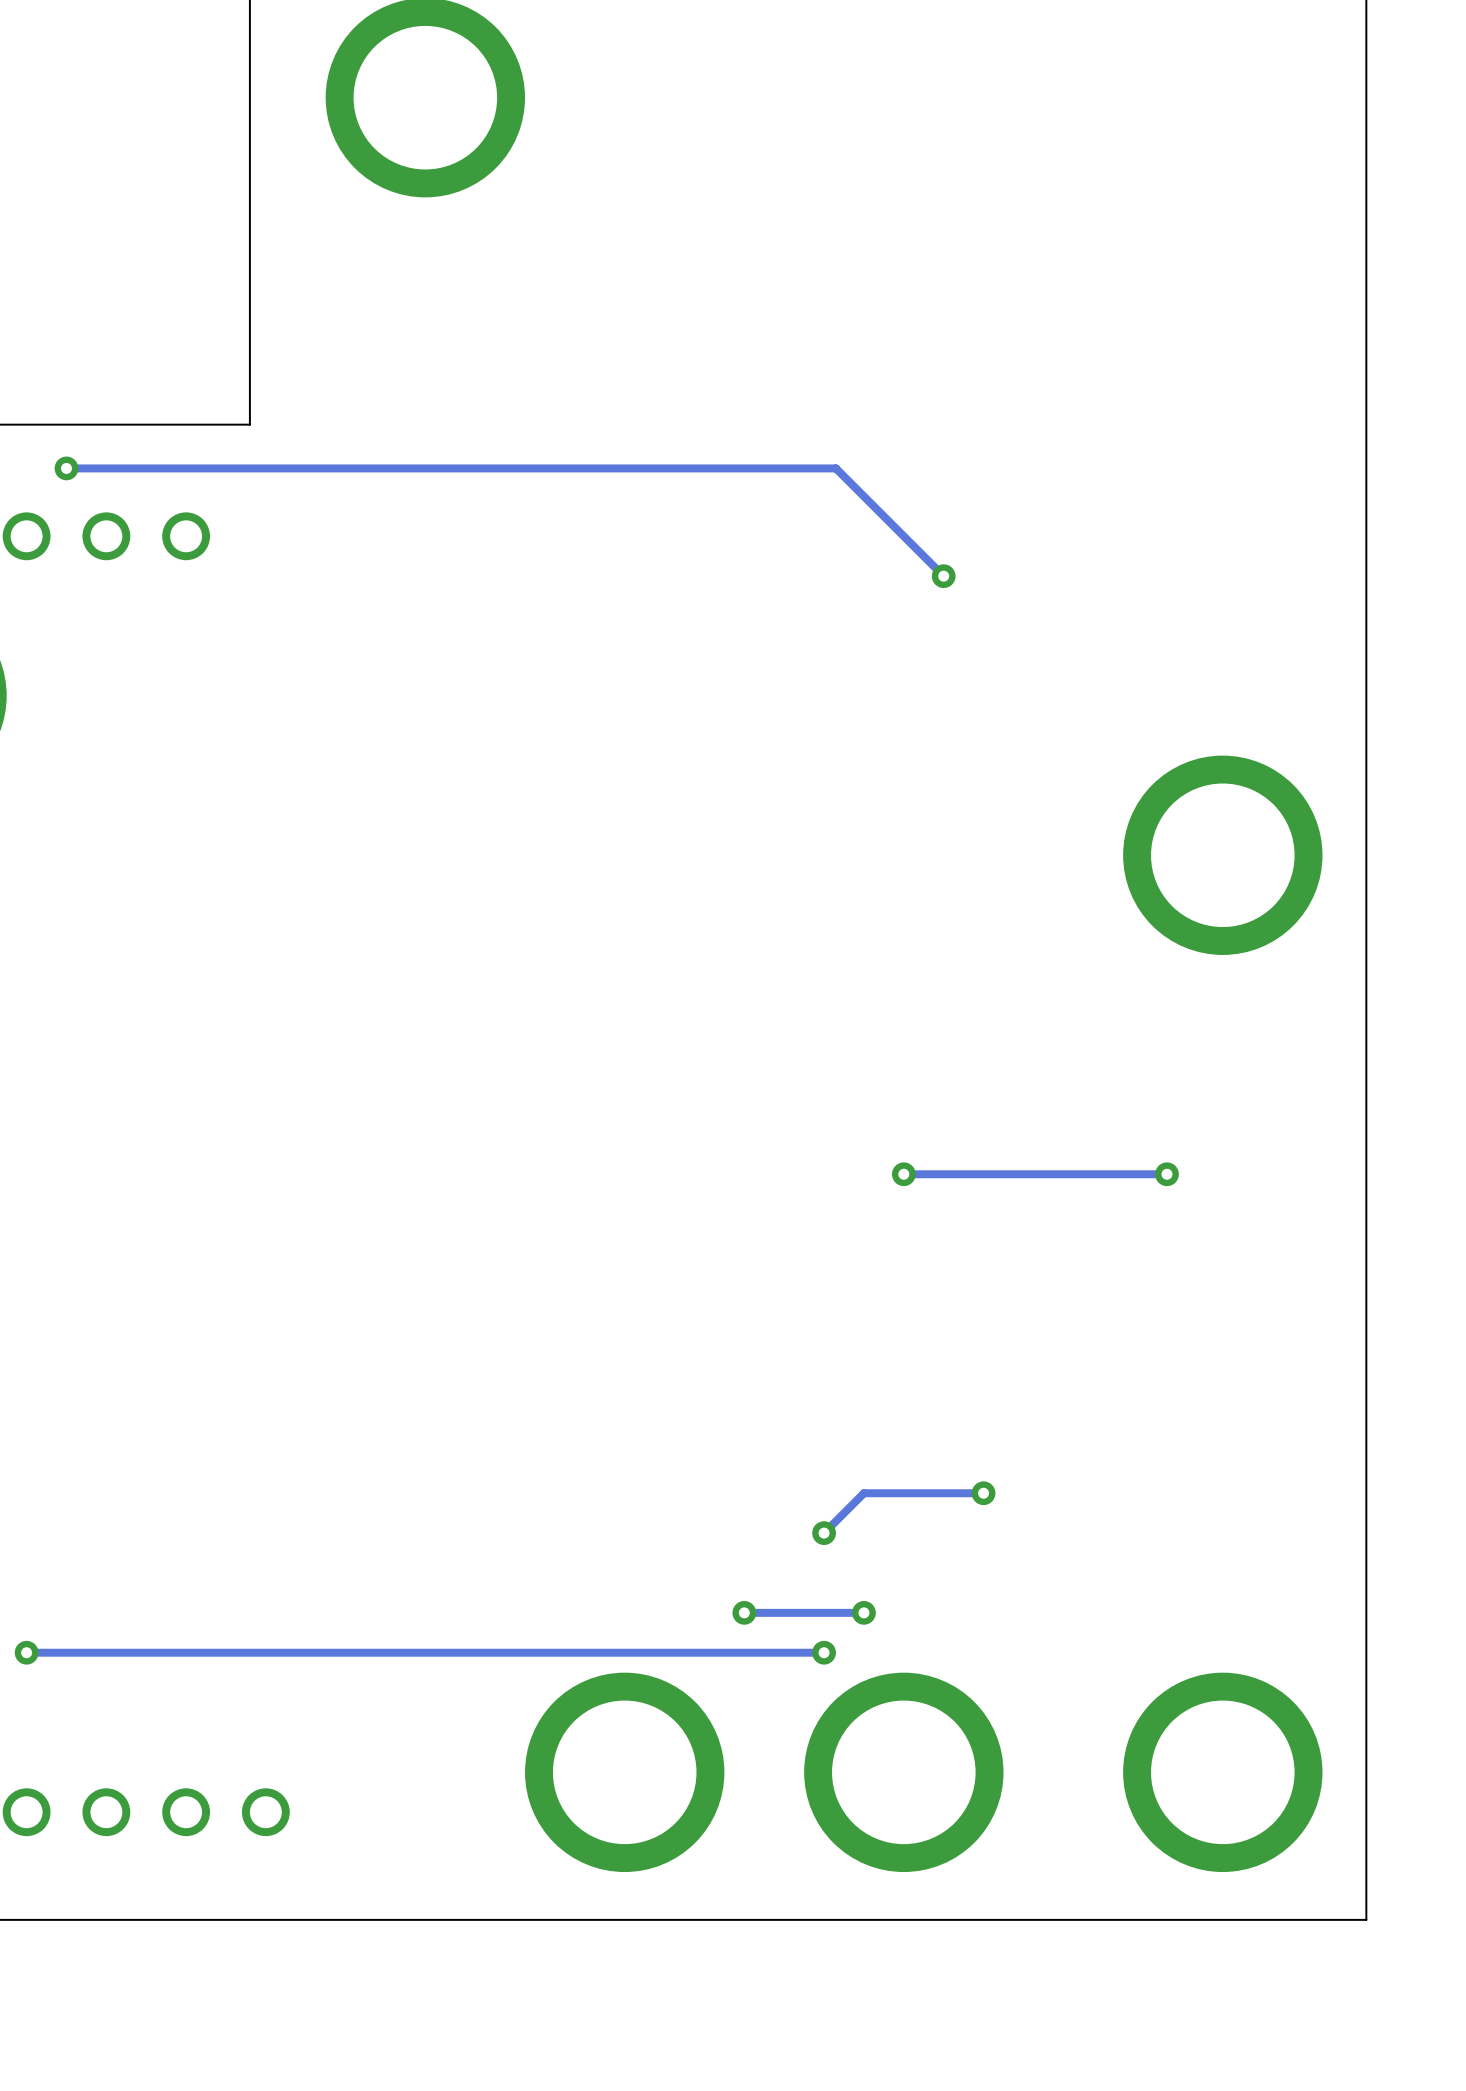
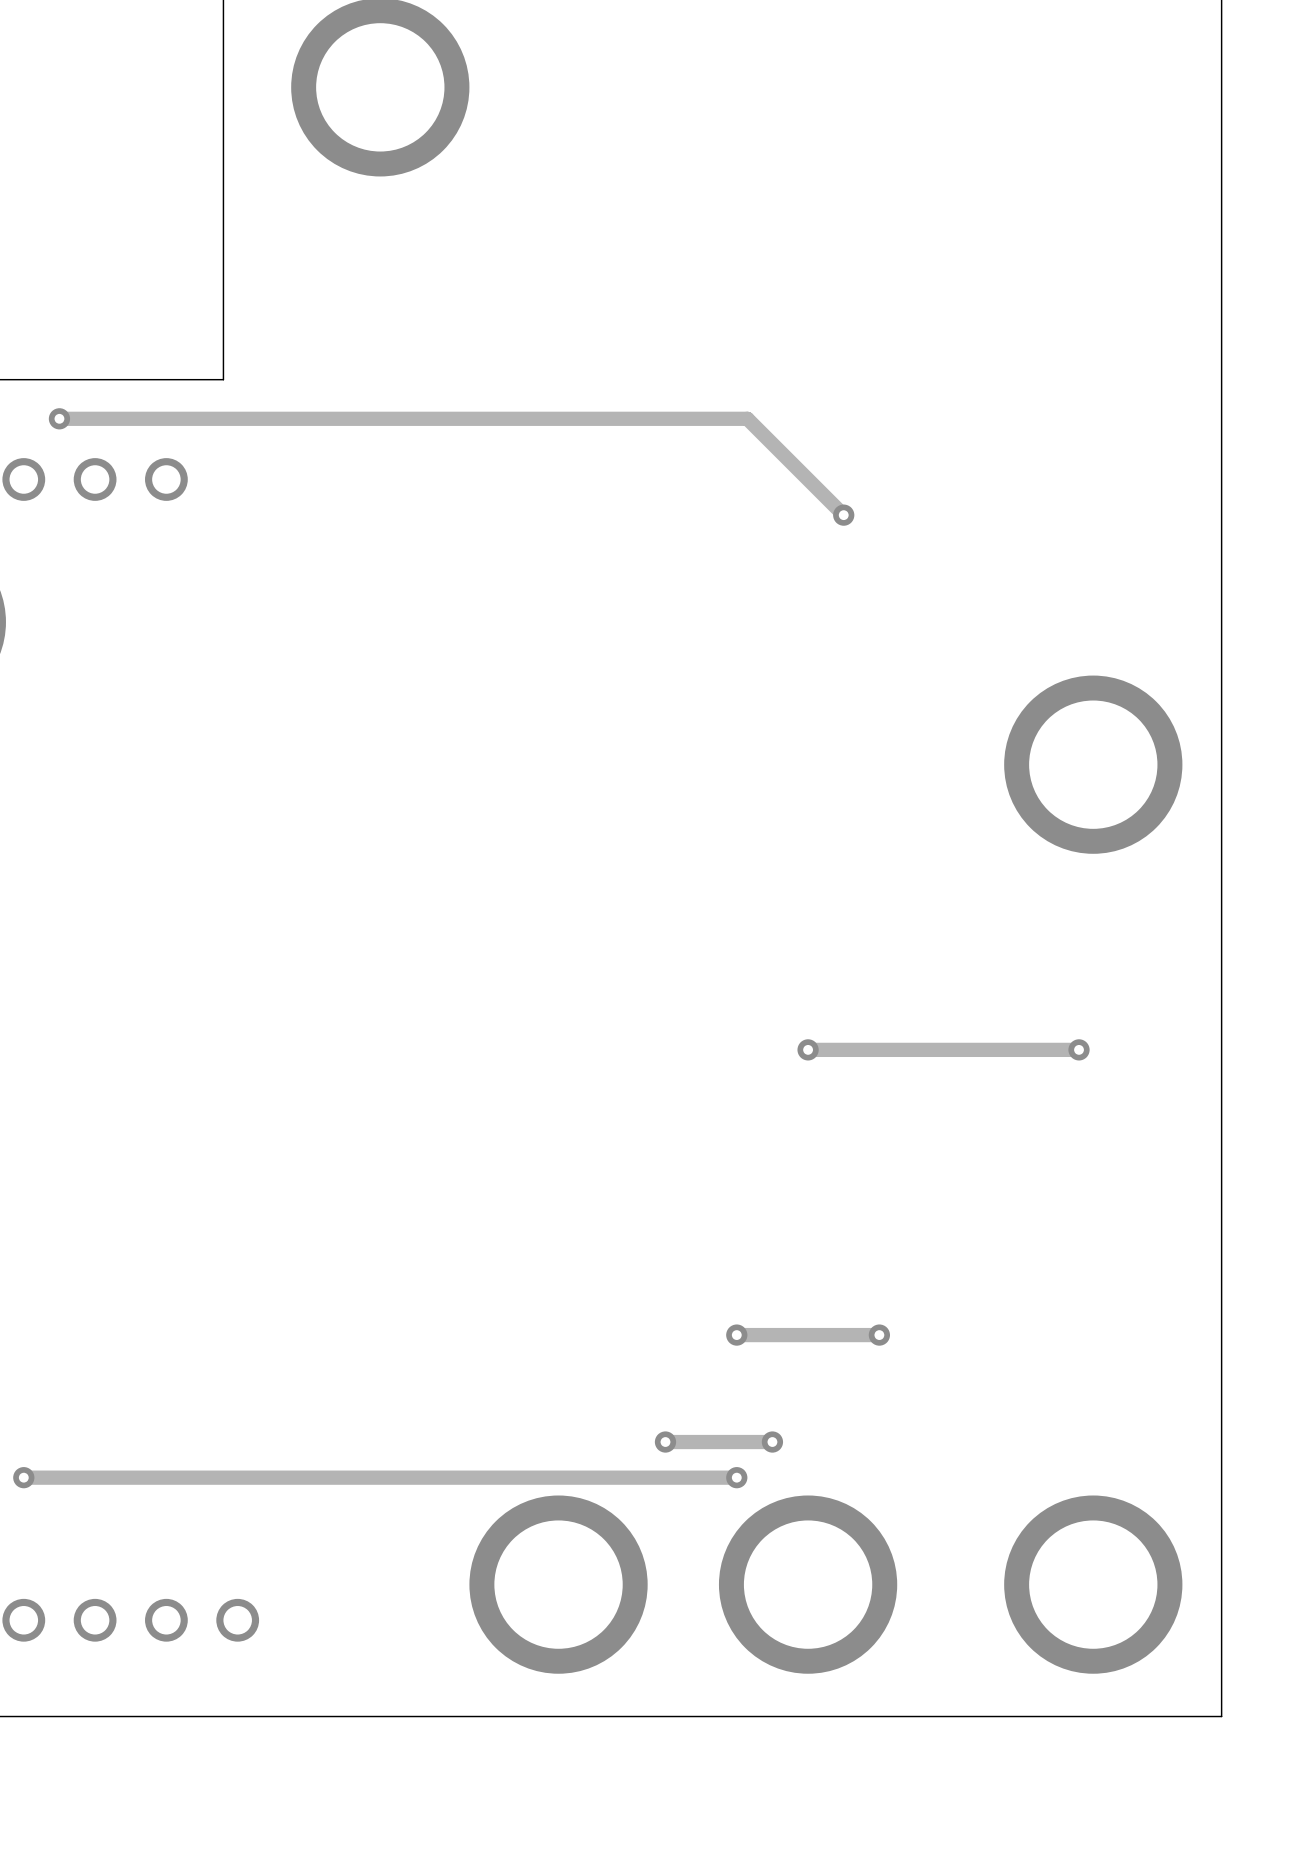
track width: thin (66, 468) (835, 468) (943, 576) -> thick (59, 418) (747, 418) (843, 515)
track width: thin (1166, 1174) (903, 1174) -> thick (1043, 1049) (808, 1049)
via position: (1166, 1174) -> (1079, 1049)
track: none -> (1079, 1049) (1043, 1049)
track: (863, 1493) (824, 1533) -> (772, 1335) (736, 1335)
track width: thin (983, 1493) (863, 1493) -> thick (879, 1335) (772, 1335)
via position: (824, 1533) -> (736, 1335)
track width: thin (863, 1612) (744, 1612) -> thick (772, 1442) (665, 1442)
track width: thin (824, 1652) (26, 1652) -> thick (736, 1477) (23, 1477)

